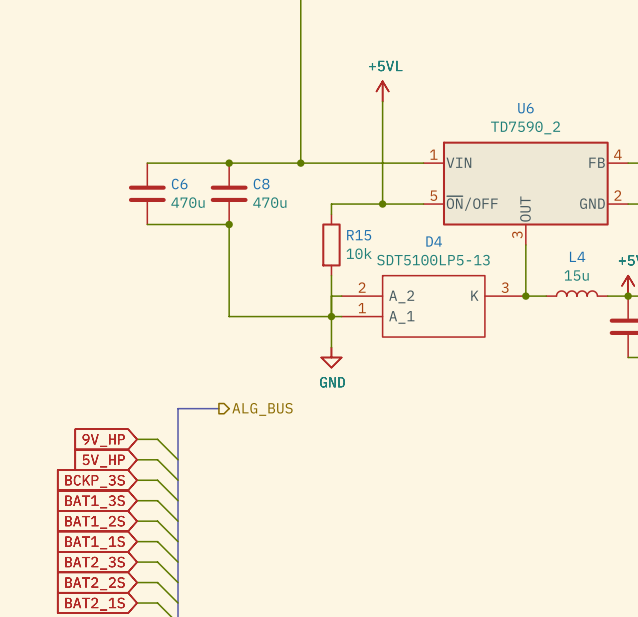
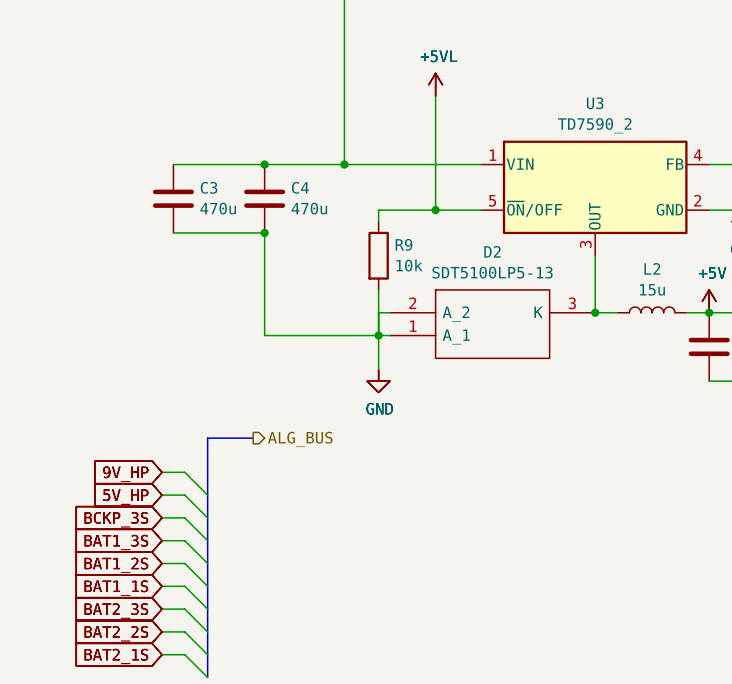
U6 name: U6 (525, 108) -> U3 (595, 103)
C6 name: C6 (179, 184) -> C3 (209, 187)
C8 name: C8 (261, 184) -> C4 (300, 187)
R15 name: R15 (359, 235) -> R9 (404, 244)
D4 name: D4 (434, 241) -> D2 (492, 251)
L4 name: L4 (577, 256) -> L2 (652, 268)

